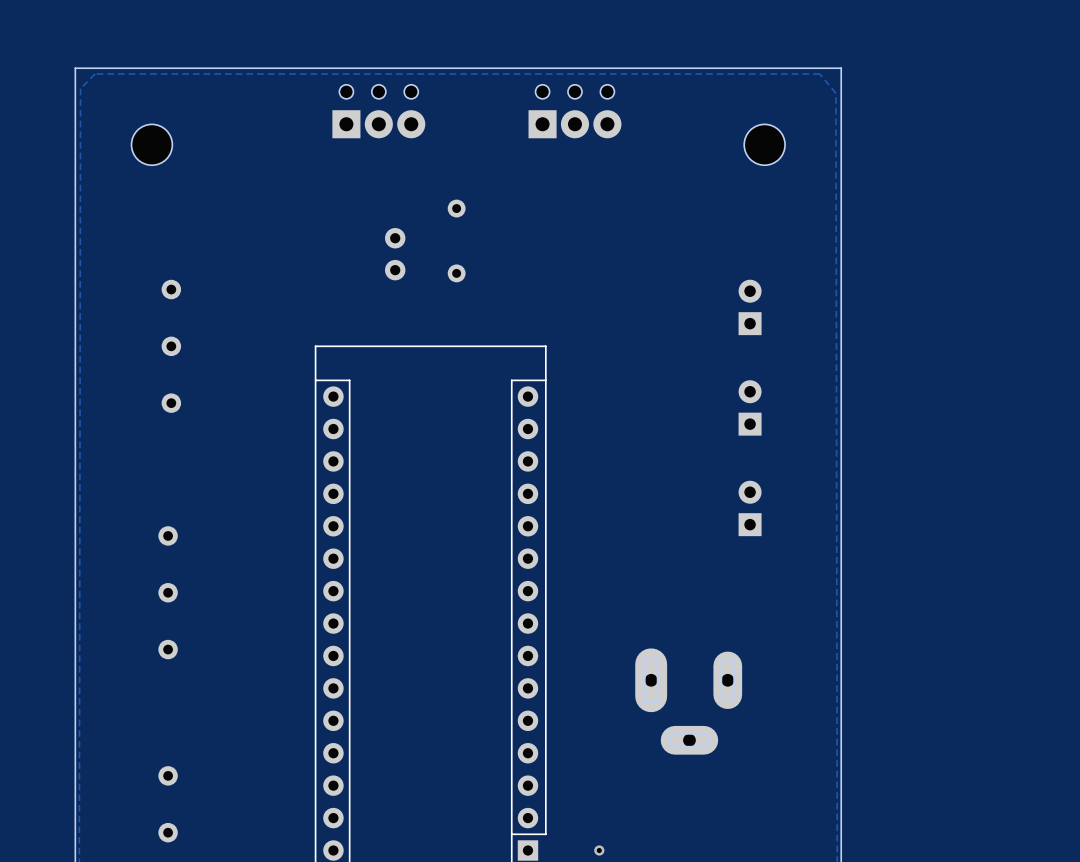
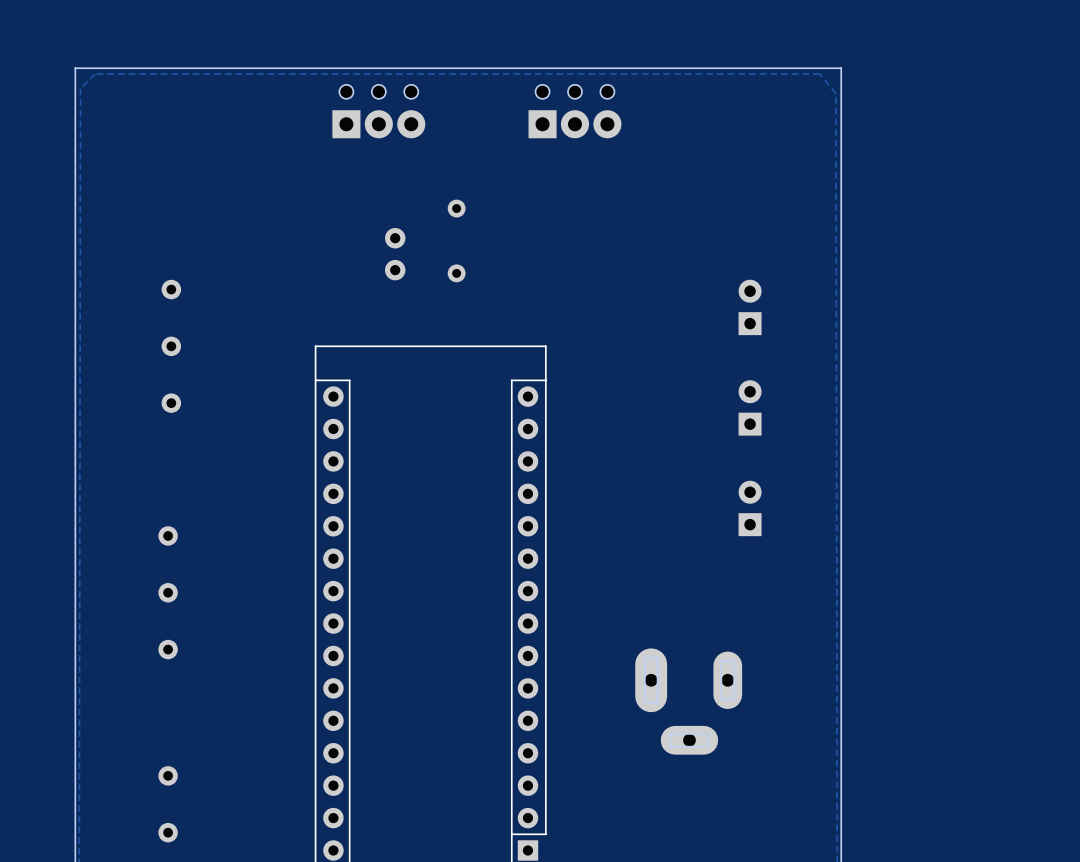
part: (151, 144) -> none
part: (764, 144) -> none
via: (599, 850) -> none

